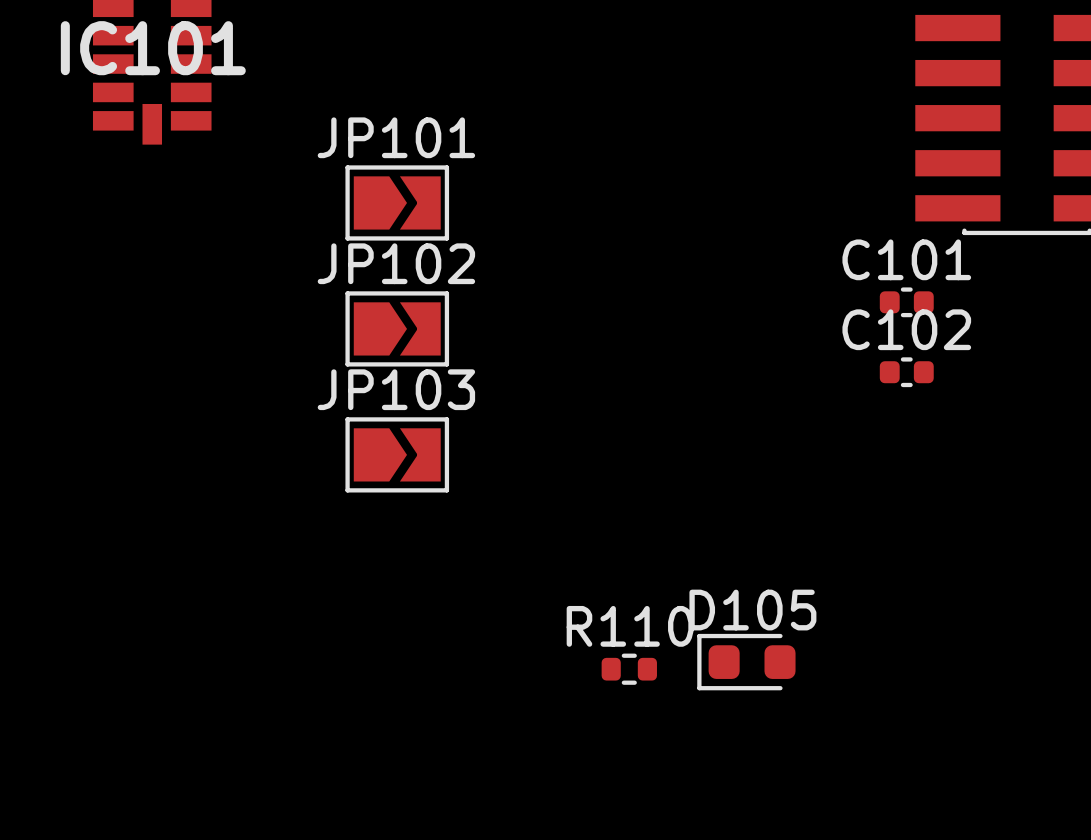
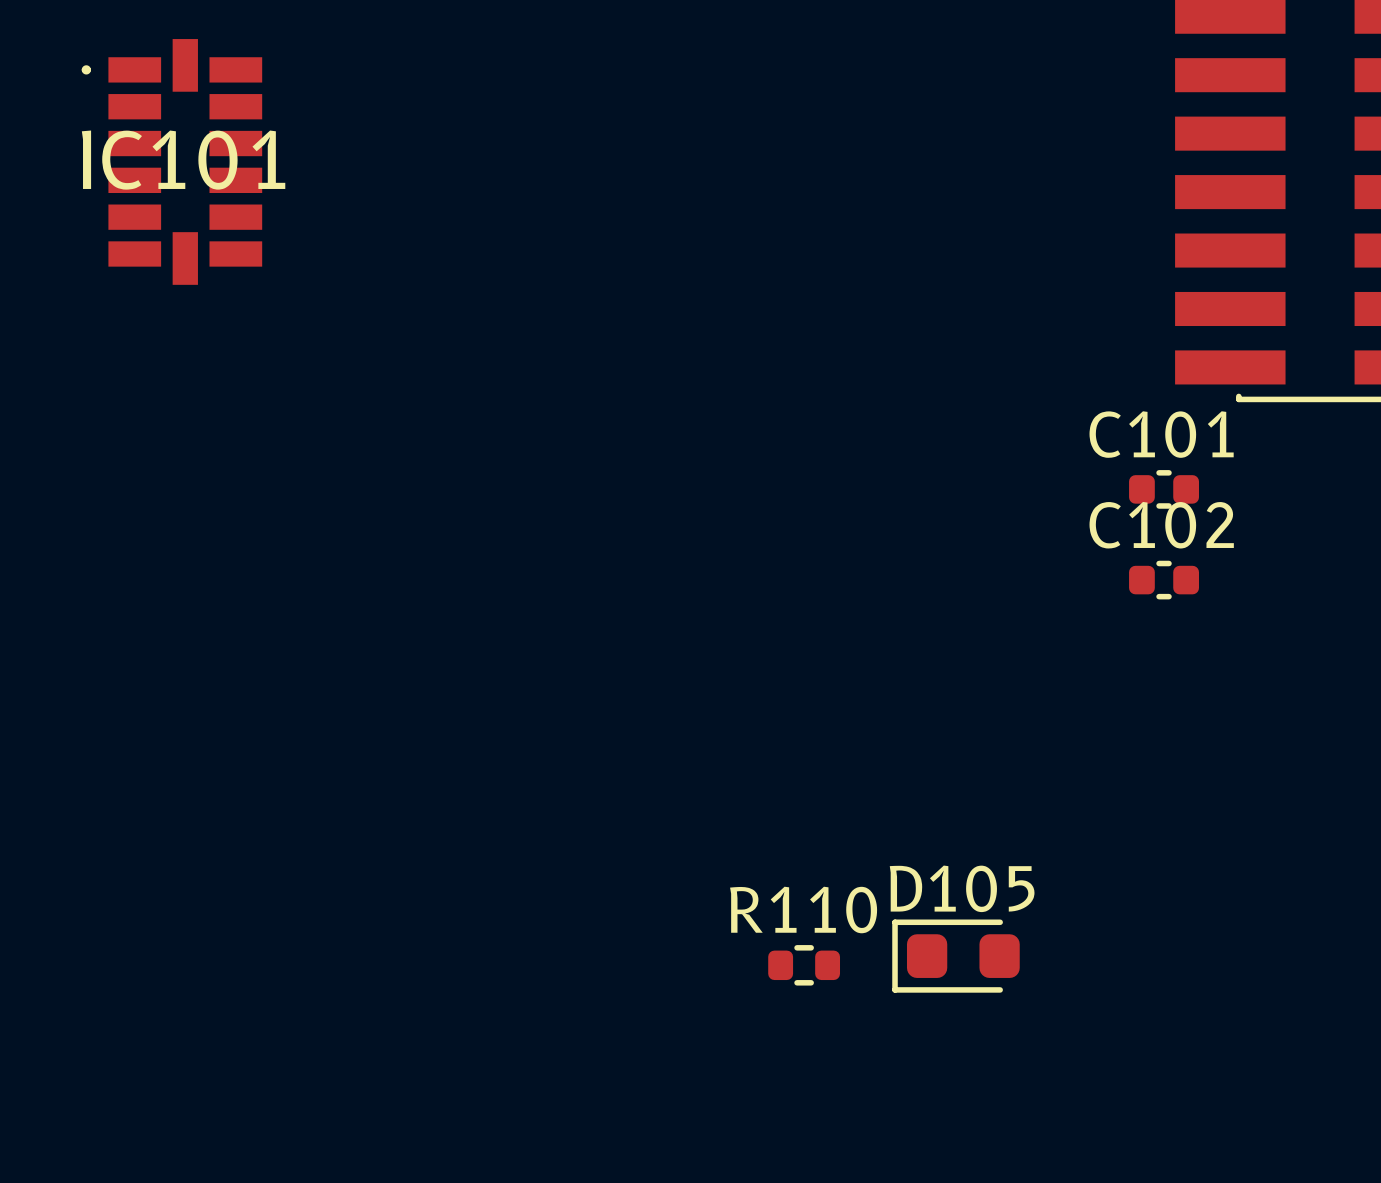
JP101: (397, 202) -> none
JP102: (397, 328) -> none
JP103: (397, 454) -> none

